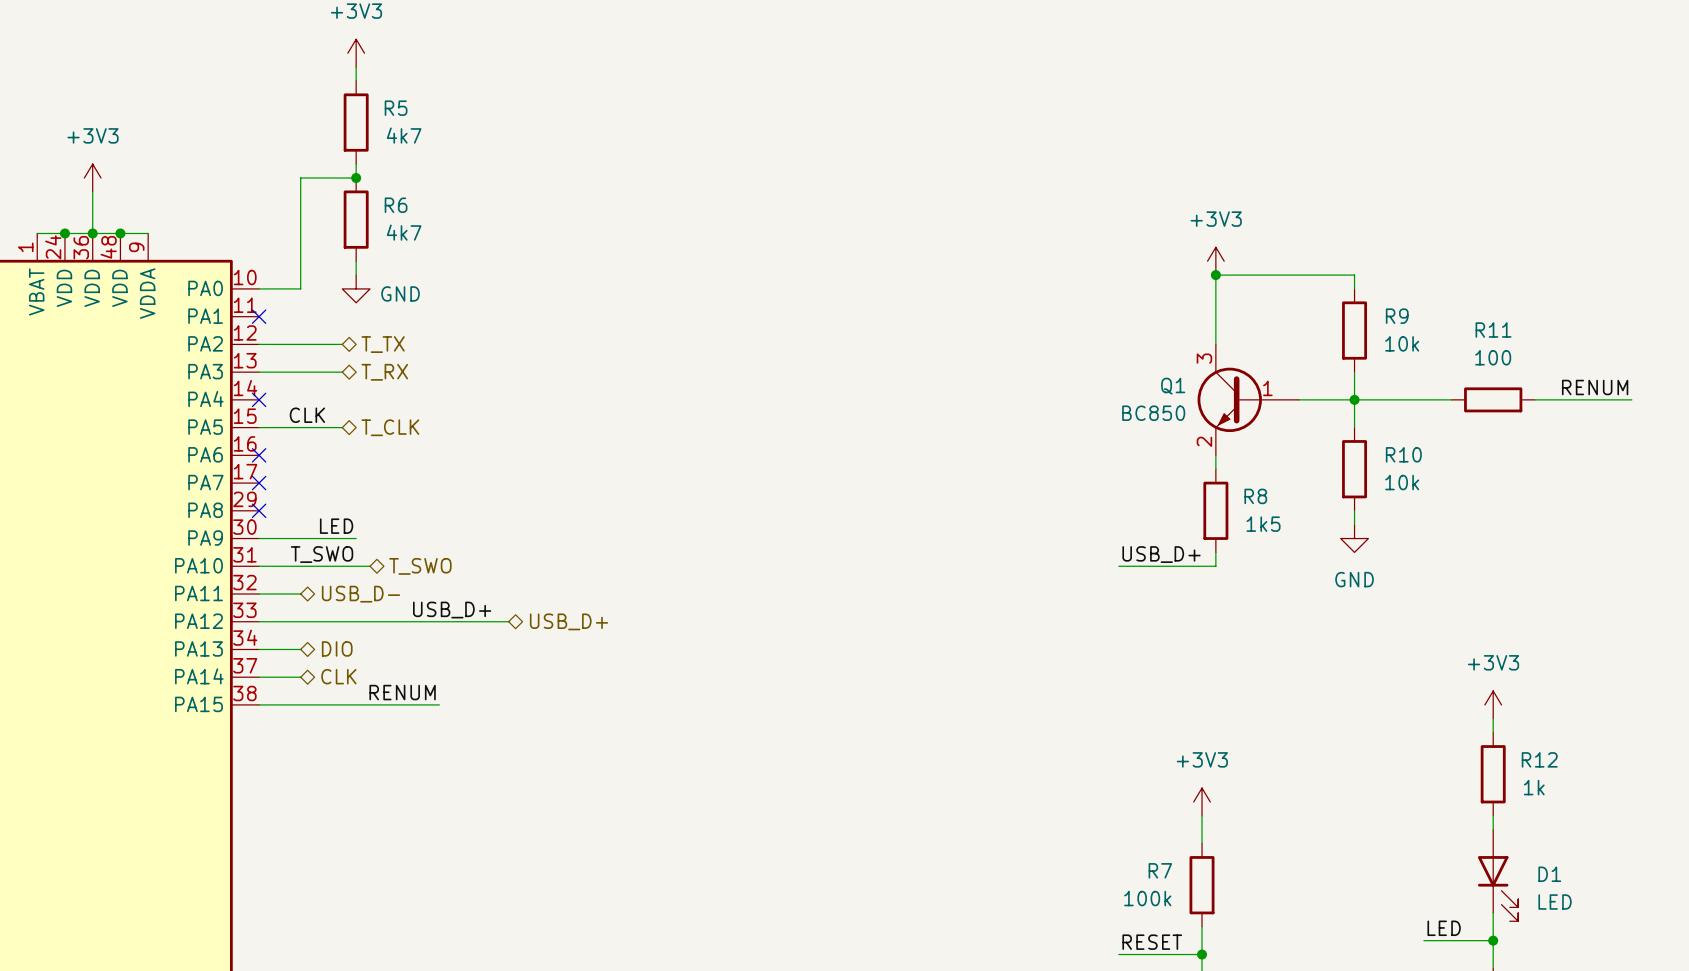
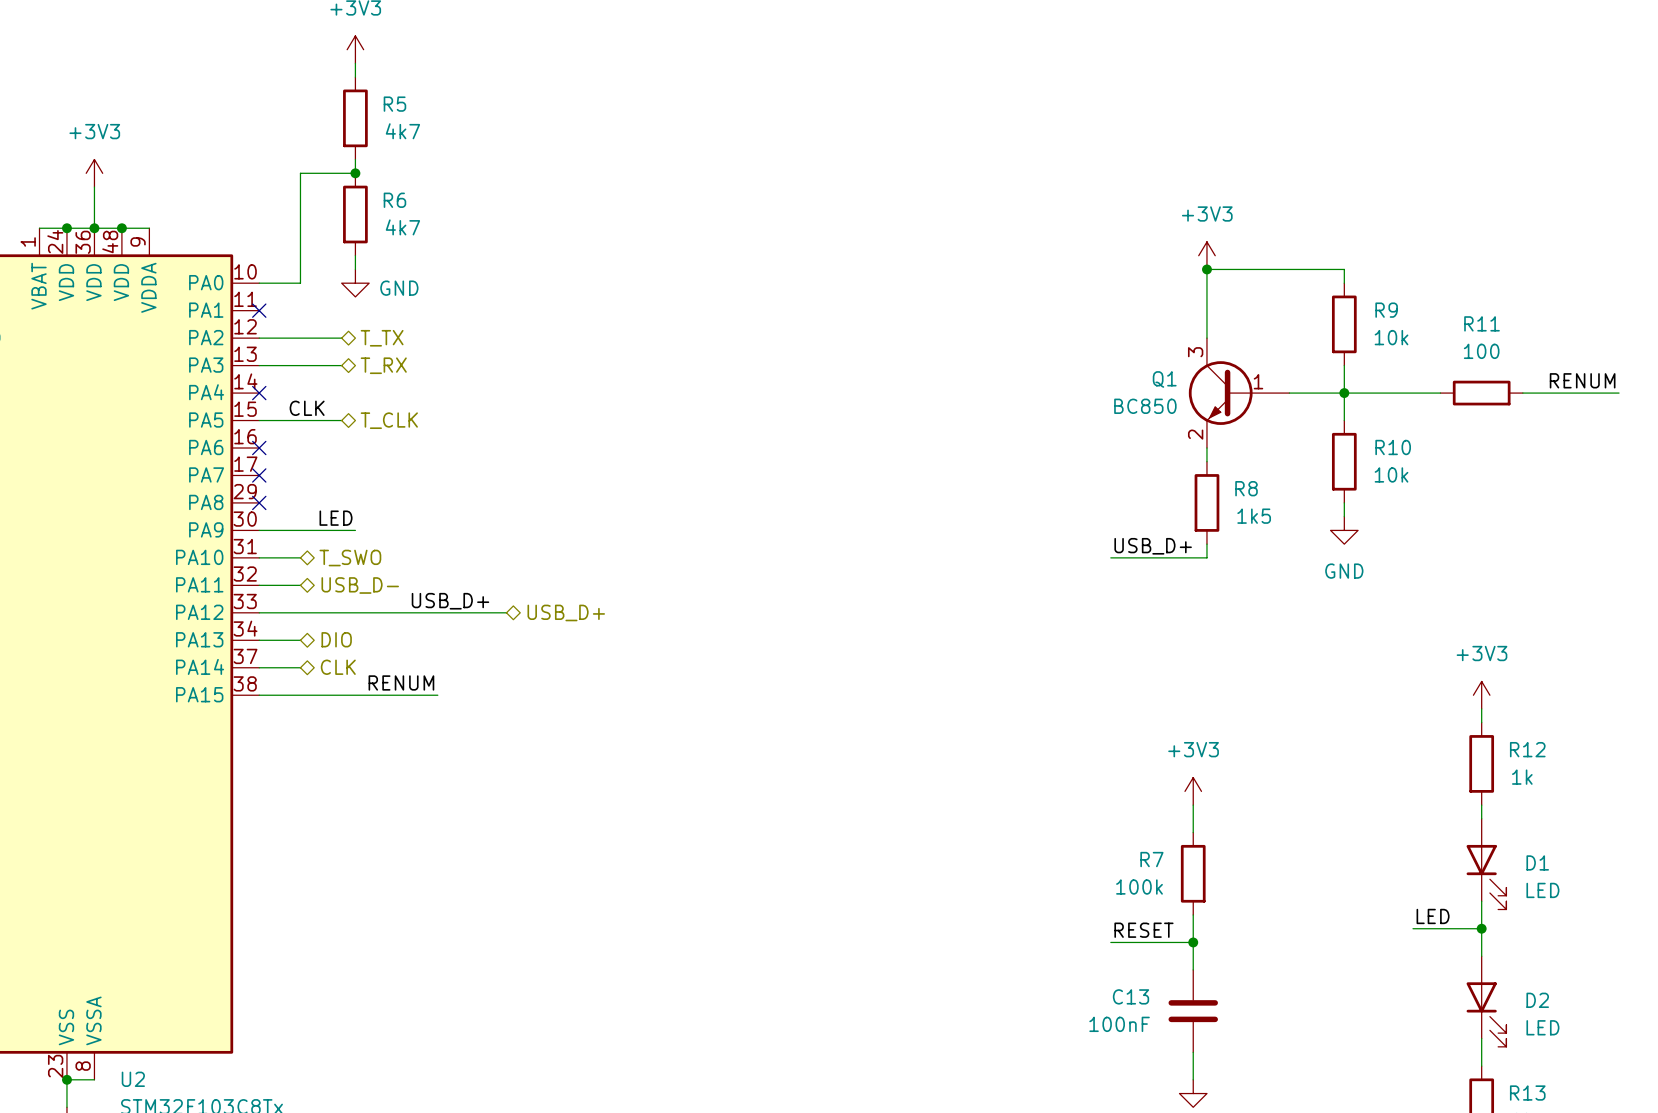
label: T_SWO (322, 554) -> none
wire: (300, 566) (370, 566) -> none
hierarchical label position: T_SWO (420, 566) -> T_SWO (350, 558)

